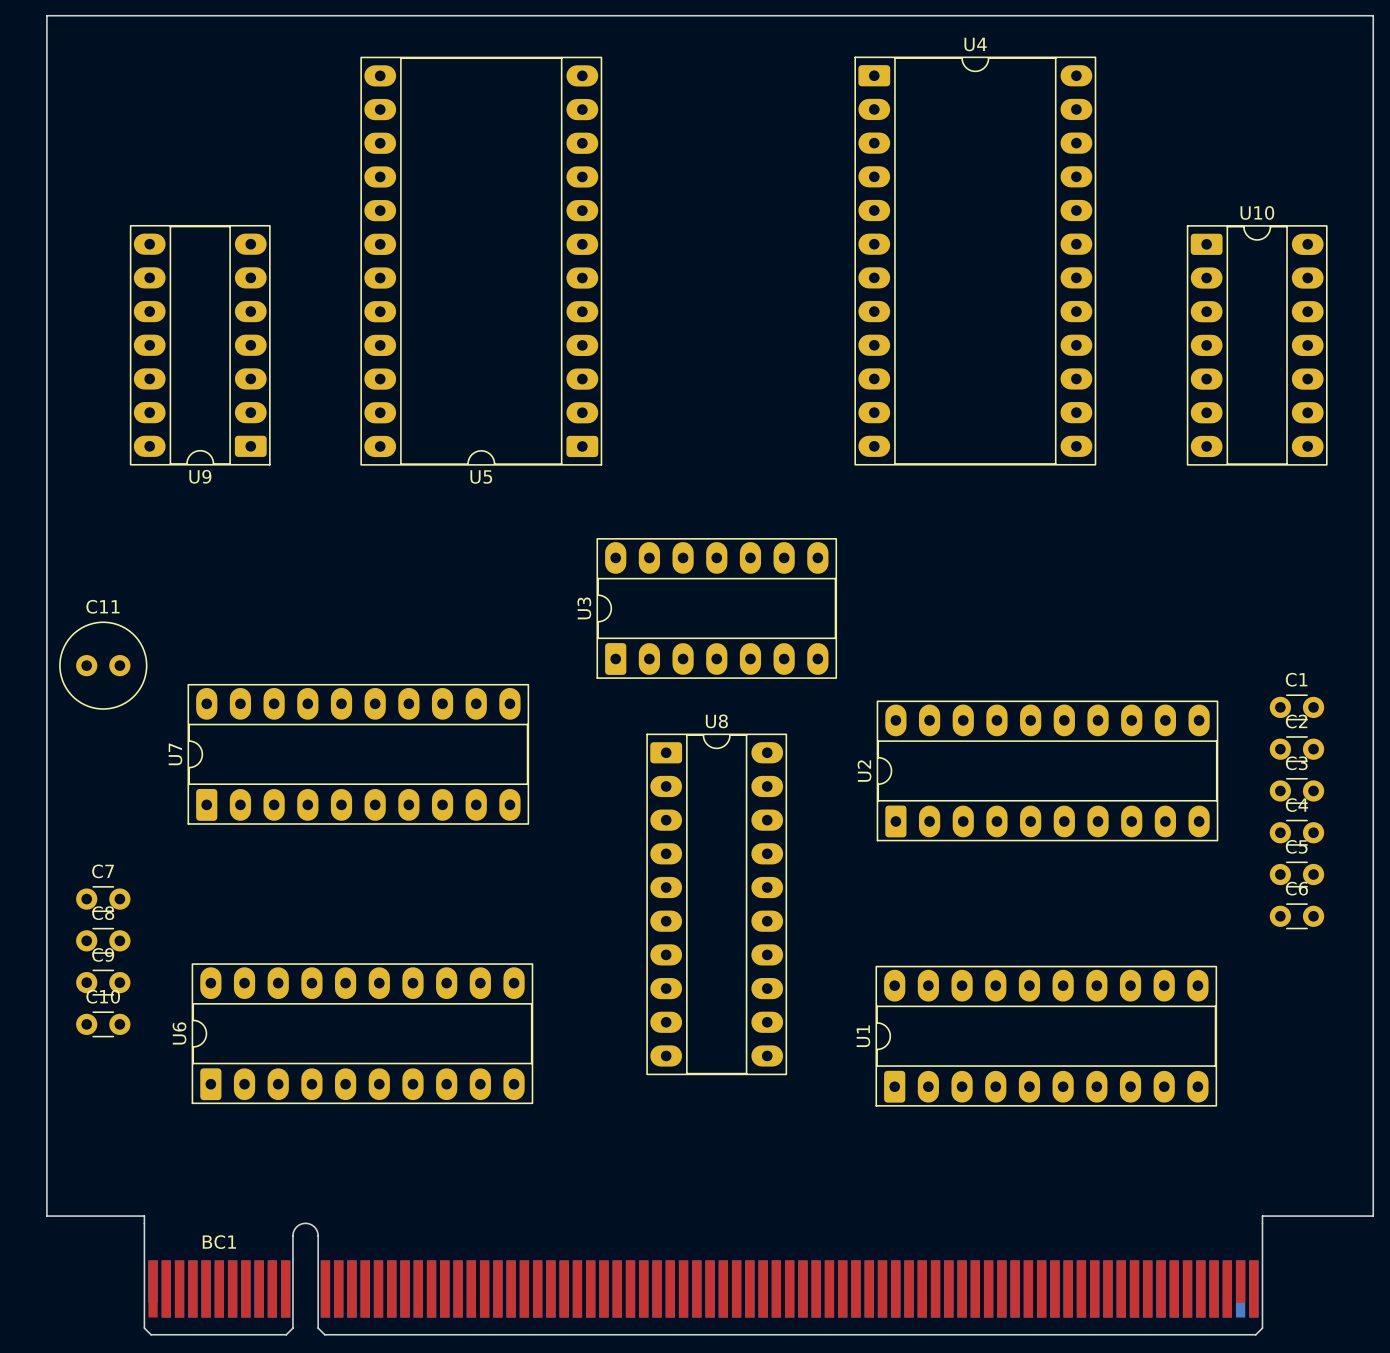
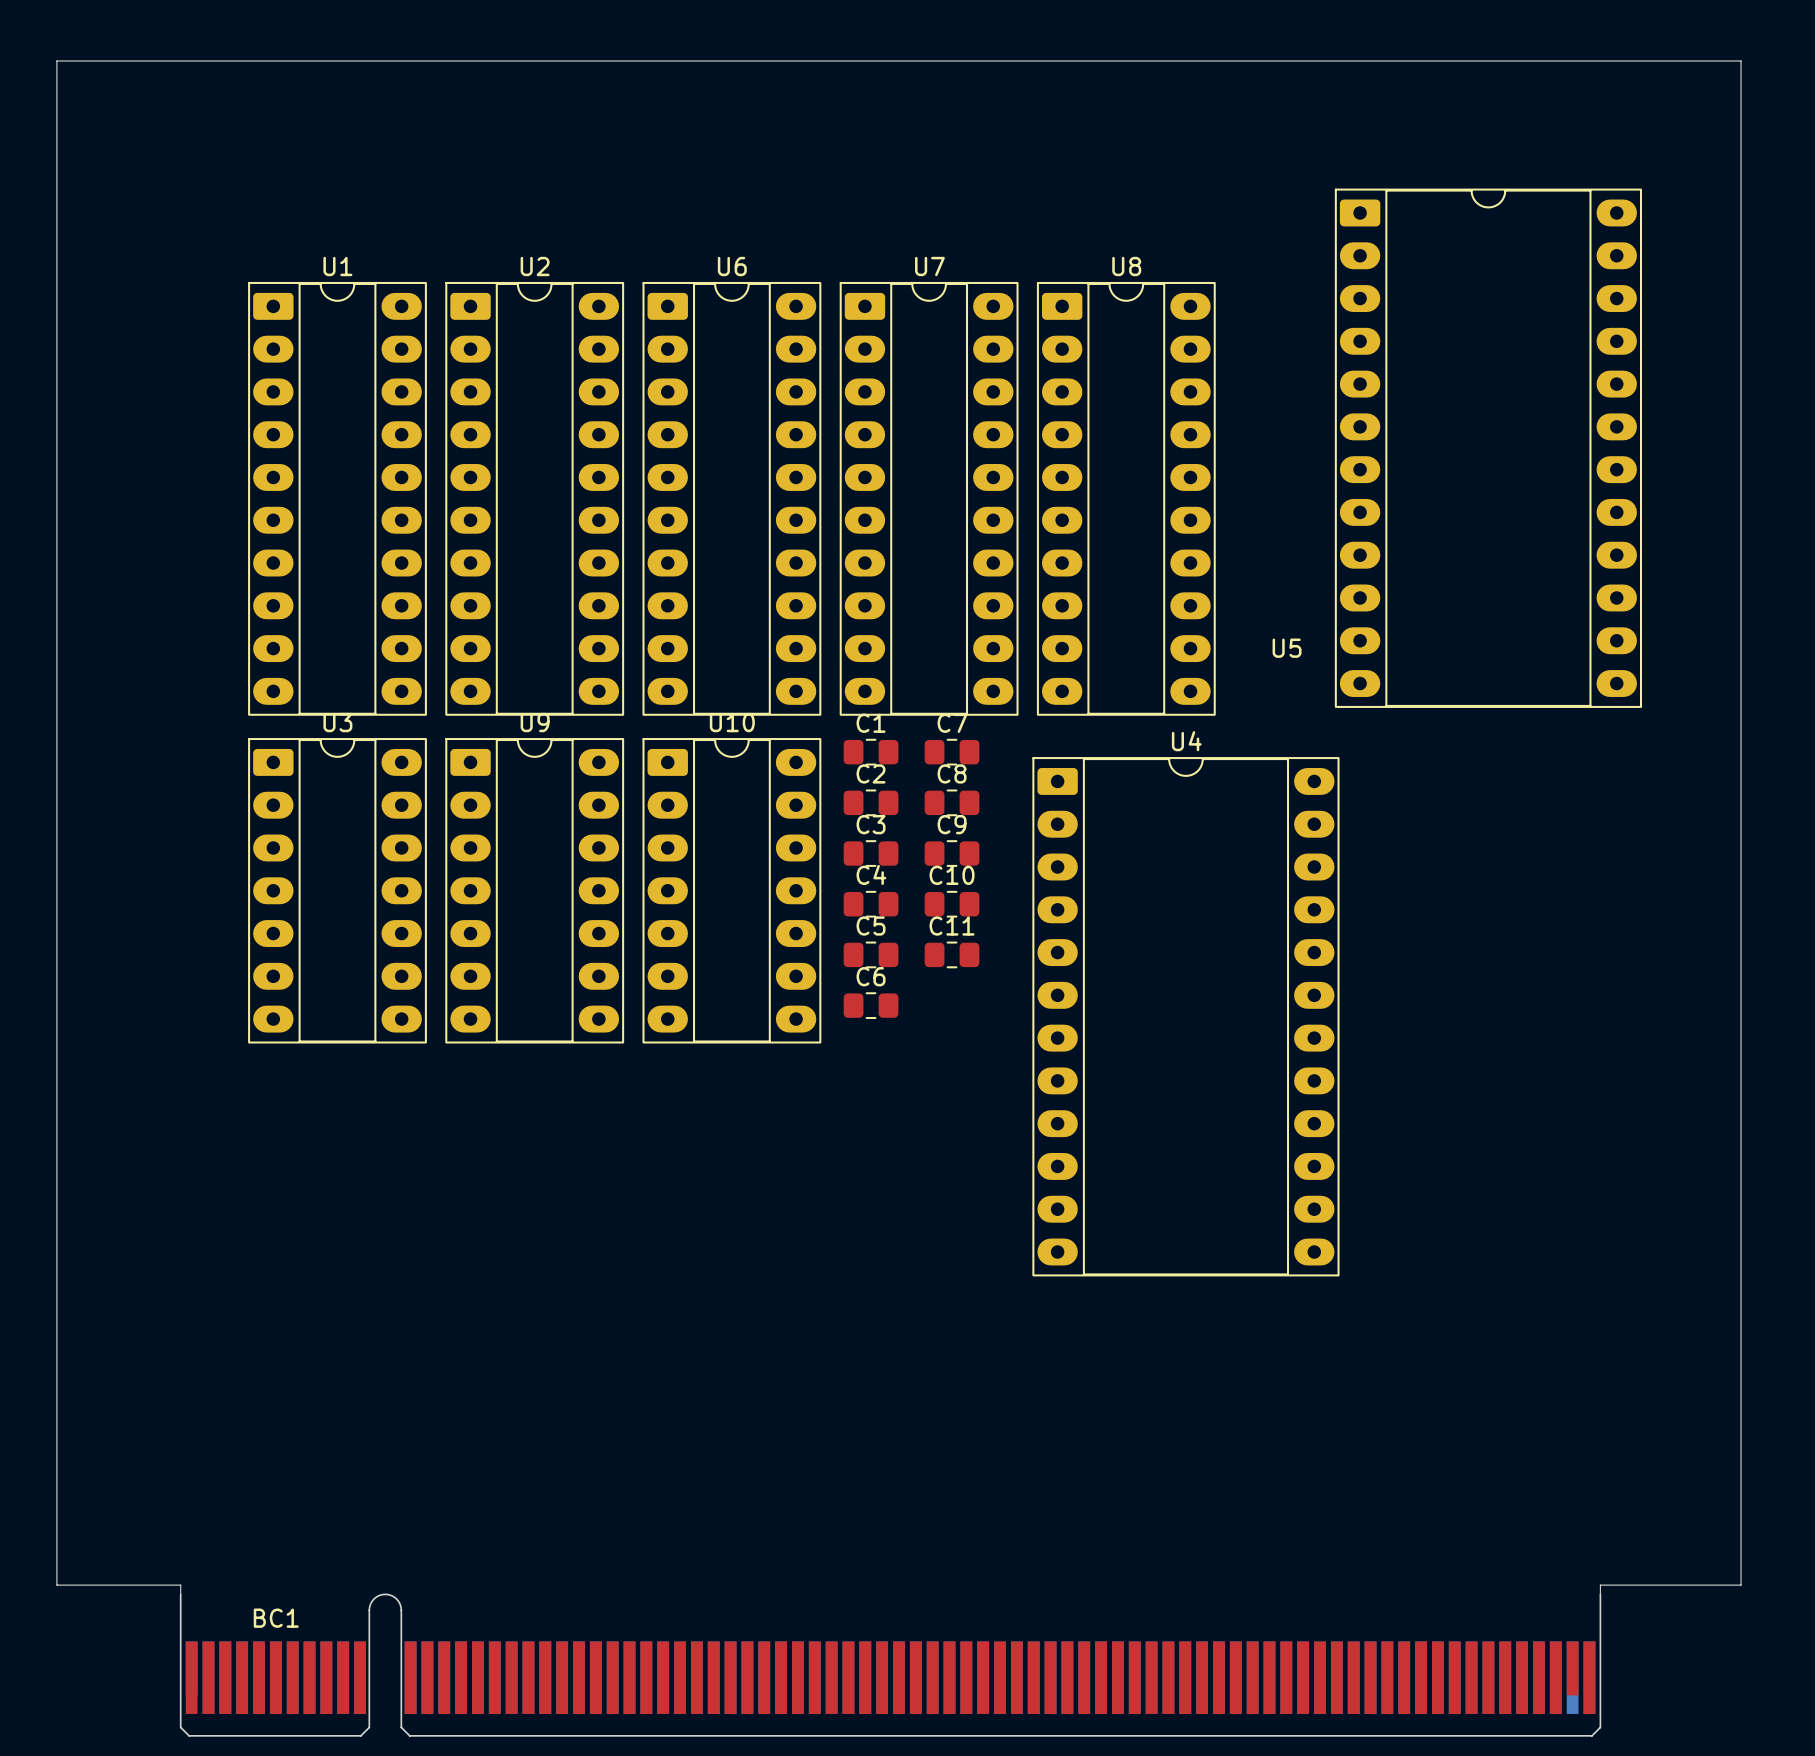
U5 rotation: 0° (481, 261) -> 180° (1488, 448)
U5 position: (481, 261) -> (1488, 448)
U4 position: (975, 261) -> (1185, 1016)
U9 rotation: 0° (200, 345) -> 180° (534, 890)
U9 position: (200, 345) -> (534, 890)
U10 position: (1257, 345) -> (731, 890)
U5 name position: U5 (481, 476) -> U5 (1287, 648)
C11 name position: C11 (102, 606) -> C11 (952, 926)
U3 rotation: 0° (716, 608) -> 90° clockwise (337, 890)
U3 position: (716, 608) -> (337, 890)
C11 footprint: [59, 621, 148, 710] -> [924, 941, 980, 969]
C1 footprint: [1269, 694, 1325, 721] -> [843, 738, 899, 766]
C2 footprint: [1269, 736, 1325, 763] -> [843, 789, 899, 817]
U7 rotation: 0° (358, 754) -> 90° clockwise (929, 498)
U7 position: (358, 754) -> (929, 498)
U2 rotation: 0° (1047, 770) -> 90° clockwise (534, 498)
U2 position: (1047, 770) -> (534, 498)
C3 footprint: [1269, 777, 1325, 804] -> [843, 840, 899, 867]
C4 footprint: [1269, 819, 1325, 846] -> [843, 890, 899, 918]
C5 footprint: [1269, 861, 1325, 888] -> [843, 941, 899, 969]
C7 footprint: [76, 886, 131, 913] -> [924, 738, 980, 766]
C6 footprint: [1269, 903, 1325, 930] -> [843, 992, 899, 1020]
U8 position: (716, 904) -> (1126, 498)
C8 footprint: [76, 927, 131, 954] -> [924, 789, 980, 817]
C9 footprint: [76, 969, 131, 996] -> [924, 840, 980, 867]
C10 footprint: [76, 1011, 131, 1038] -> [924, 890, 980, 918]
U6 rotation: 0° (362, 1033) -> 90° clockwise (731, 498)
U6 position: (362, 1033) -> (731, 498)
U1 rotation: 0° (1046, 1036) -> 90° clockwise (337, 498)
U1 position: (1046, 1036) -> (337, 498)

